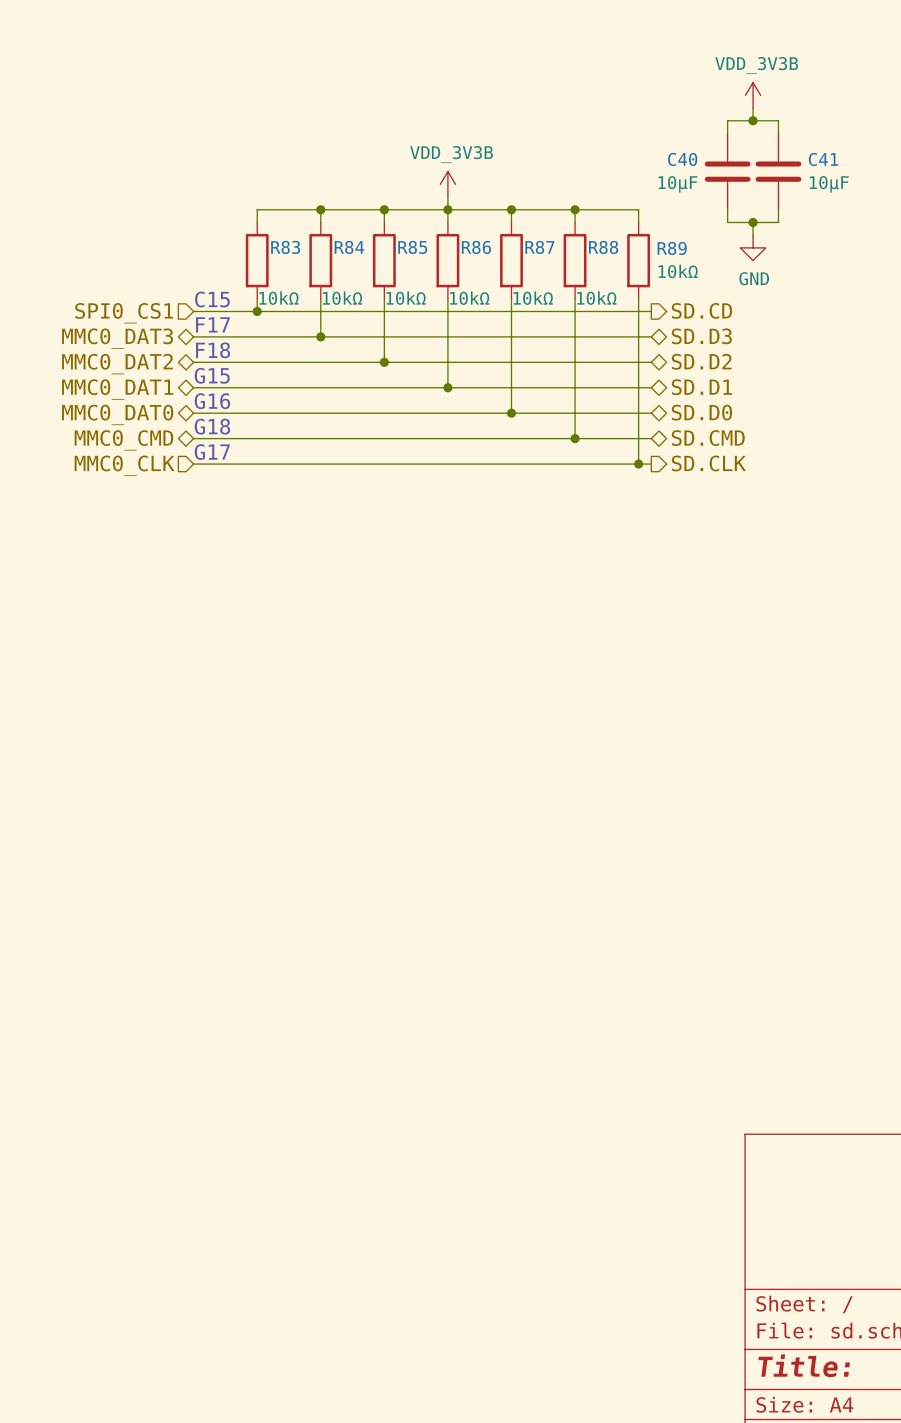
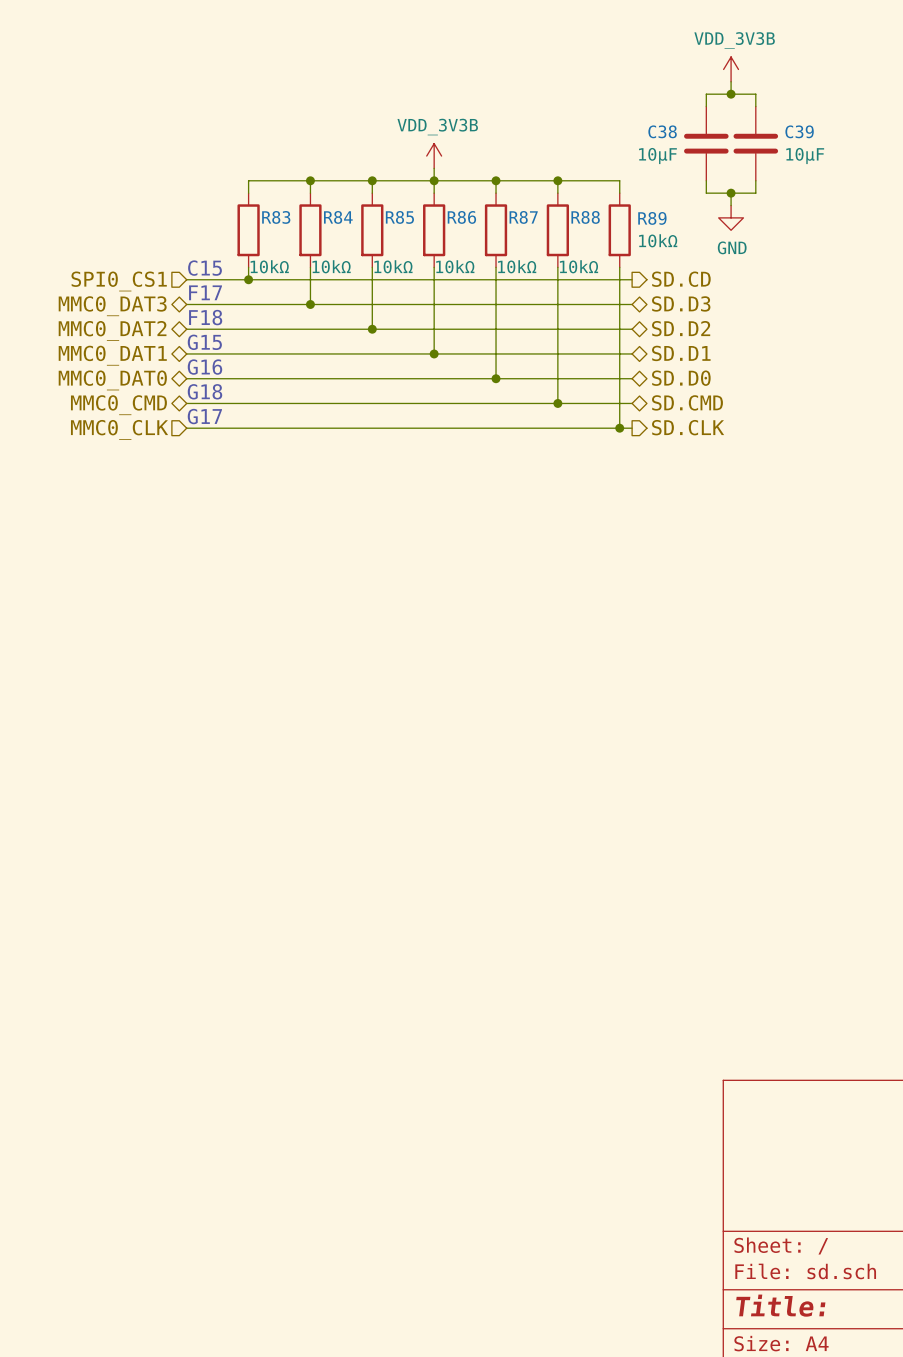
C40 name: C40 (682, 159) -> C38 (662, 131)
C41 name: C41 (823, 159) -> C39 (799, 131)

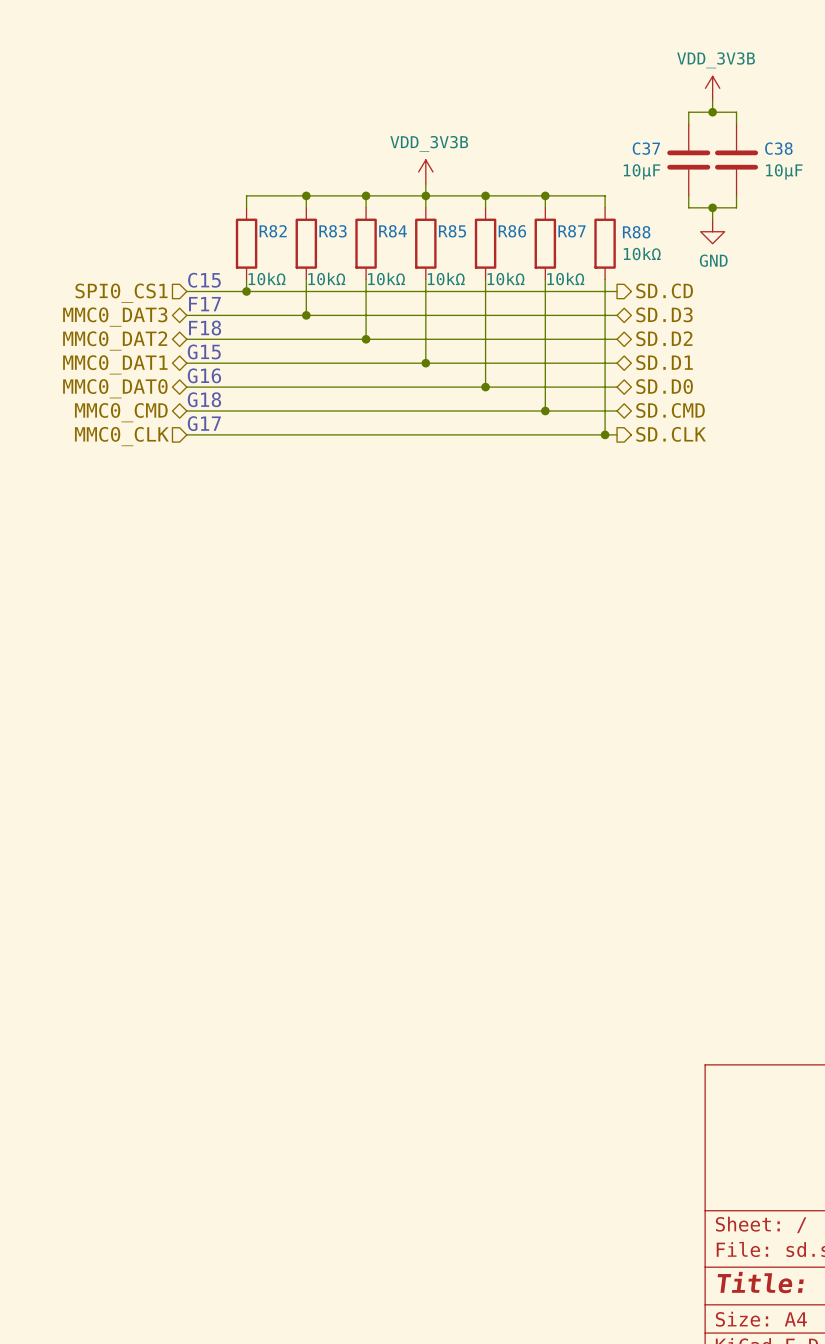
C38 name: C38 (662, 131) -> C37 (646, 148)
C39 name: C39 (799, 131) -> C38 (778, 148)
R83 name: R83 (276, 217) -> R82 (273, 231)
R84 name: R84 (338, 217) -> R83 (333, 231)
R85 name: R85 (399, 217) -> R84 (393, 231)
R86 name: R86 (461, 217) -> R85 (452, 231)
R87 name: R87 (523, 217) -> R86 (512, 231)
R88 name: R88 (585, 217) -> R87 (572, 231)
R89 name: R89 (652, 218) -> R88 (636, 232)

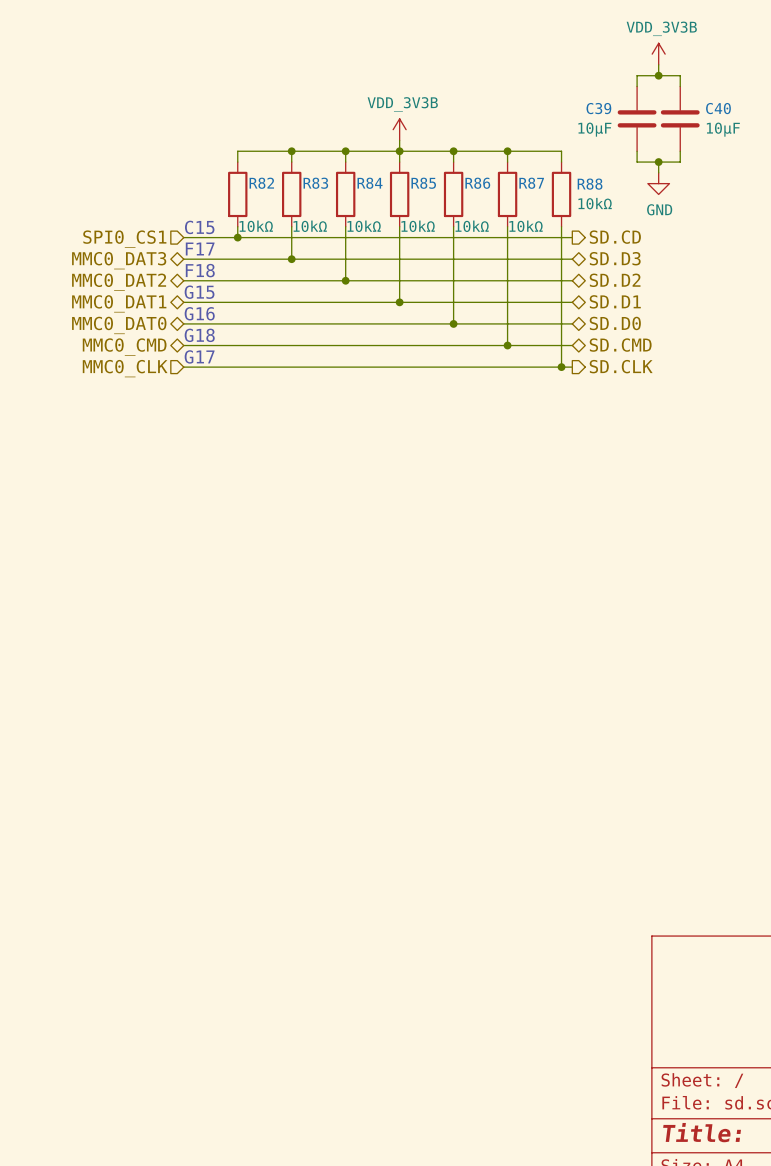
C37 name: C37 (646, 148) -> C39 (598, 108)
C38 name: C38 (778, 148) -> C40 (718, 108)

